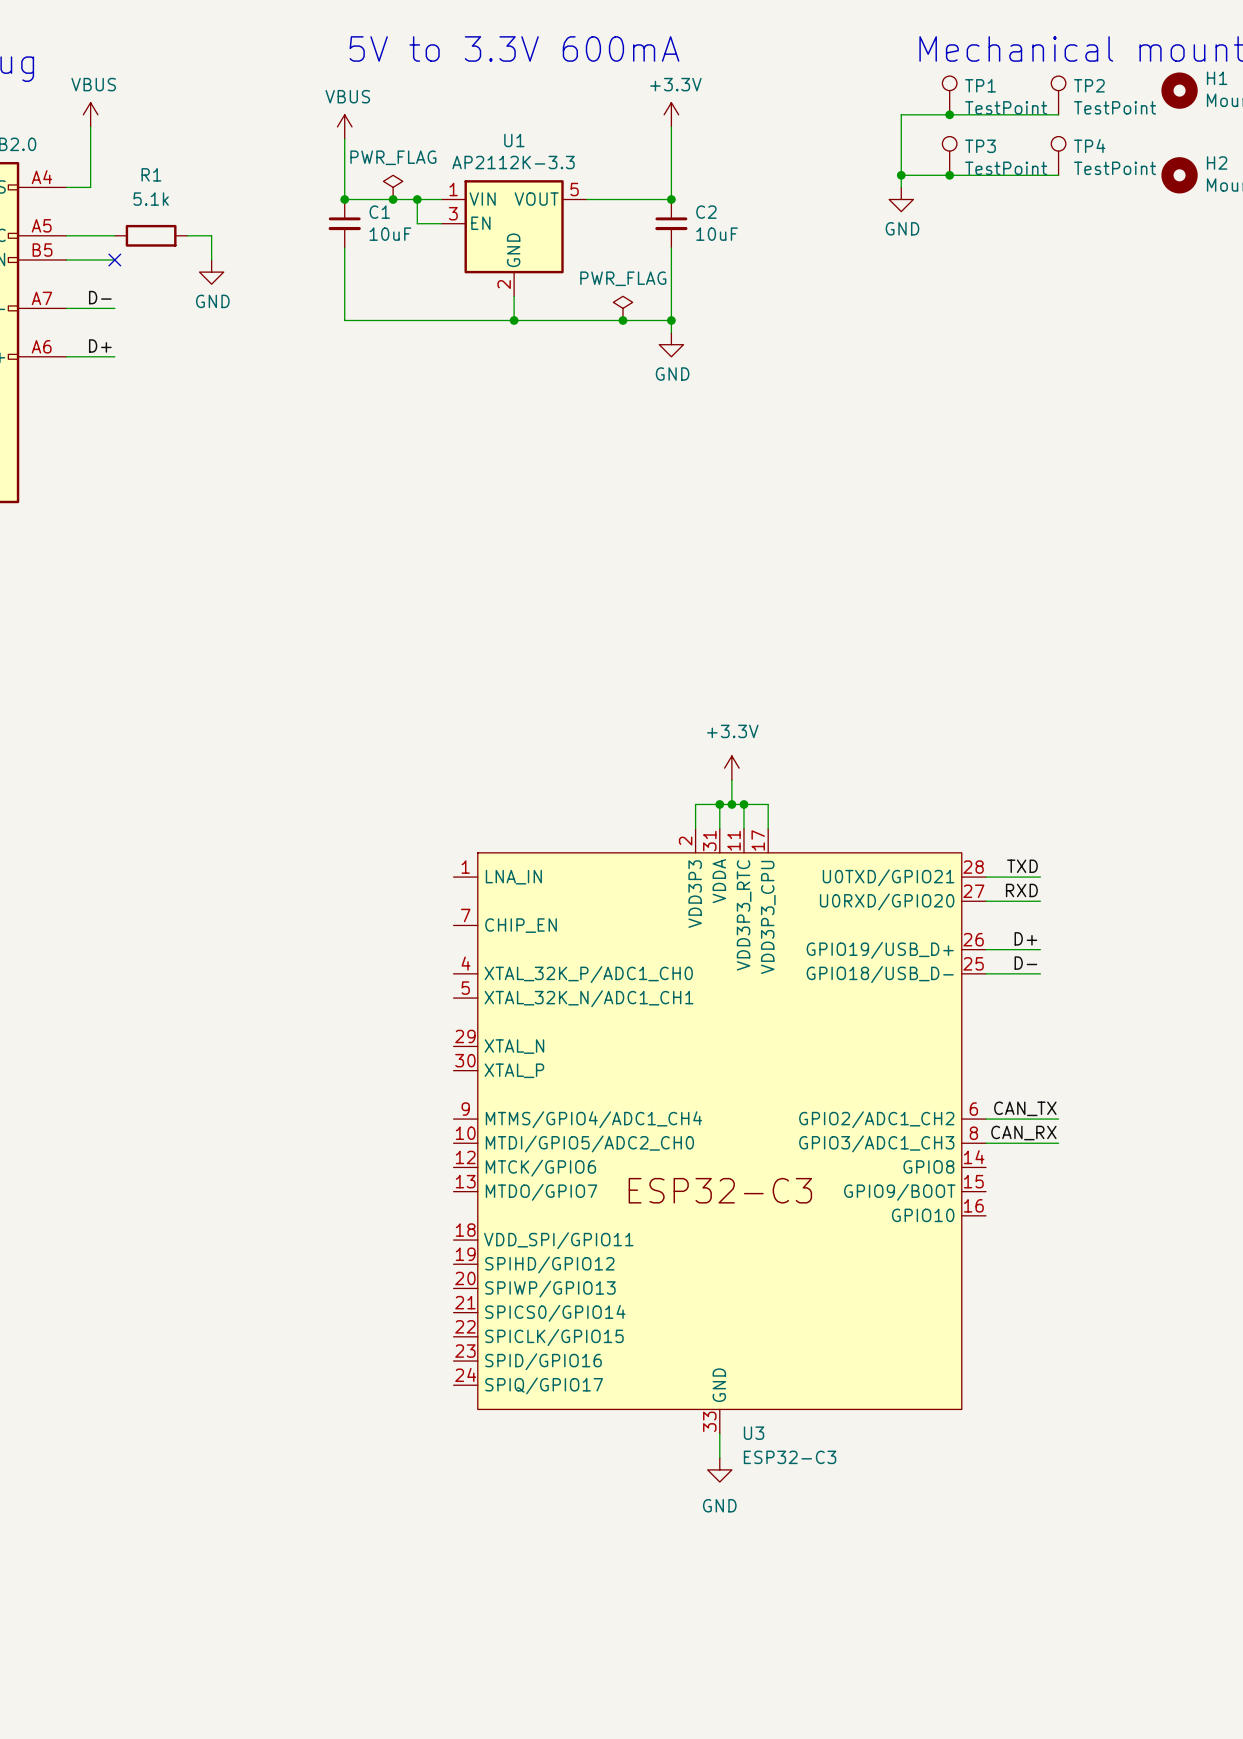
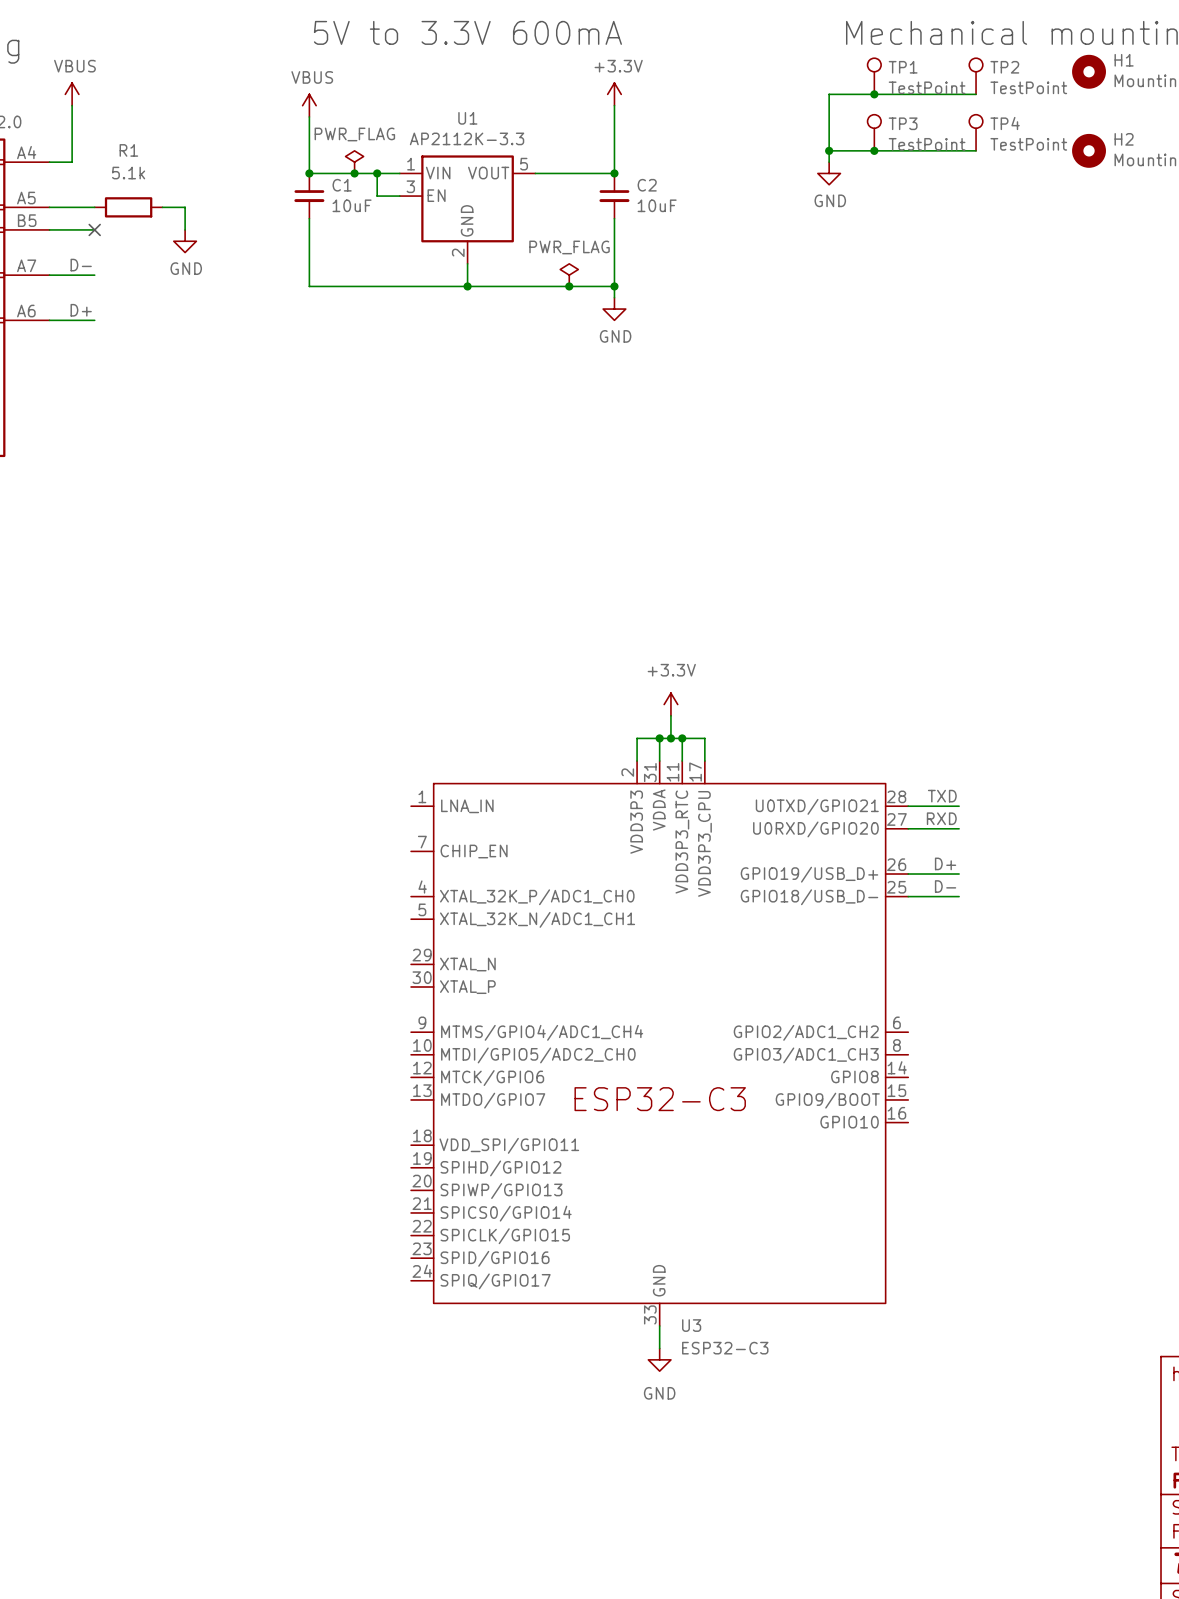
label: CAN_TX (1025, 1108) -> none
wire: (985, 1119) (1058, 1119) -> none
label: CAN_RX (1023, 1133) -> none
wire: (985, 1143) (1058, 1143) -> none

